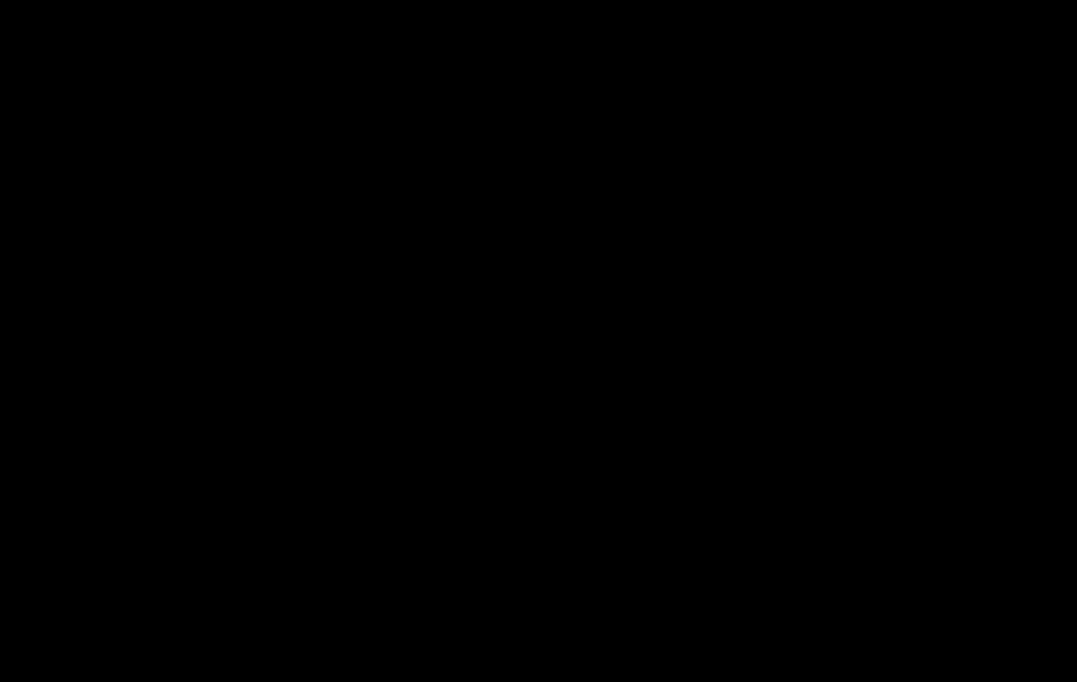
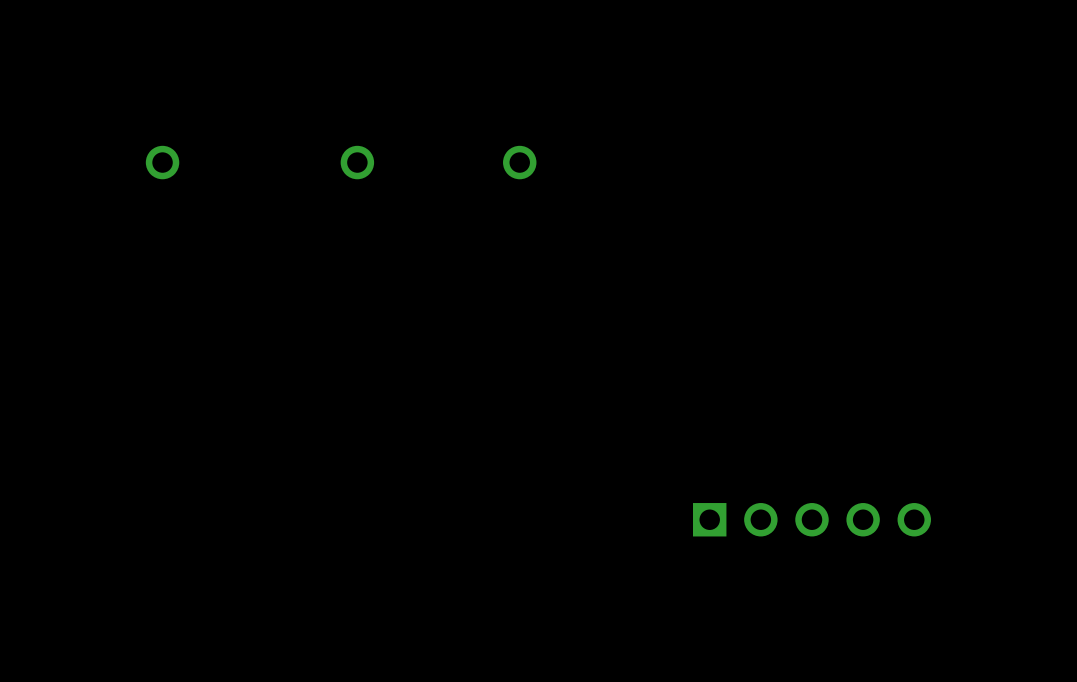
part: none -> (162, 162)
part: none -> (357, 162)
part: none -> (519, 162)
part: none -> (811, 519)

